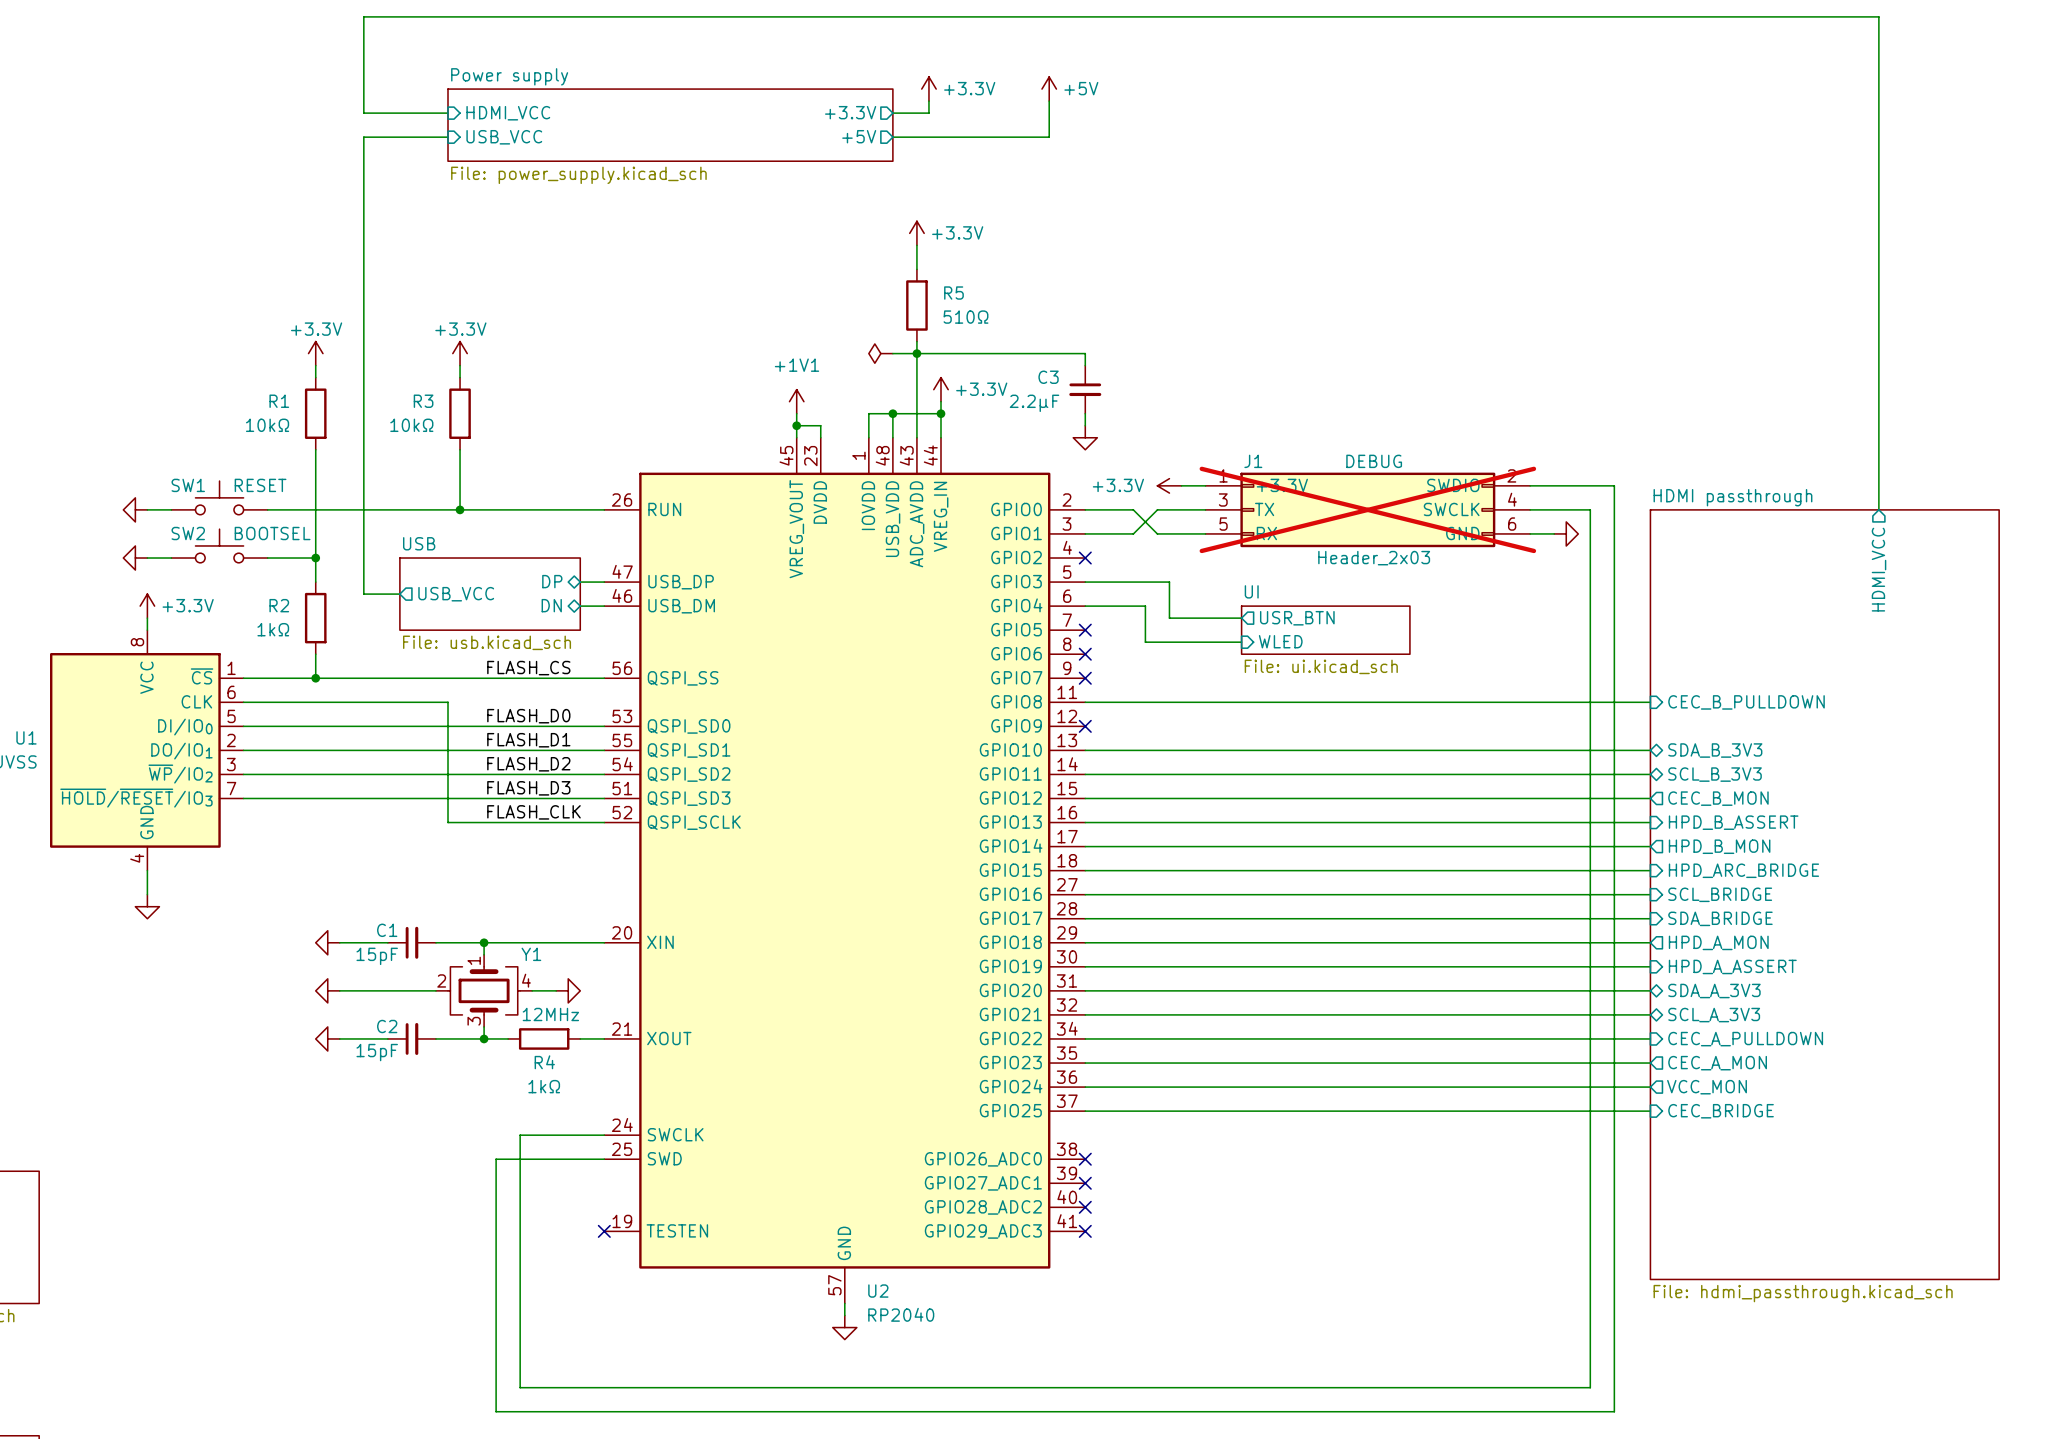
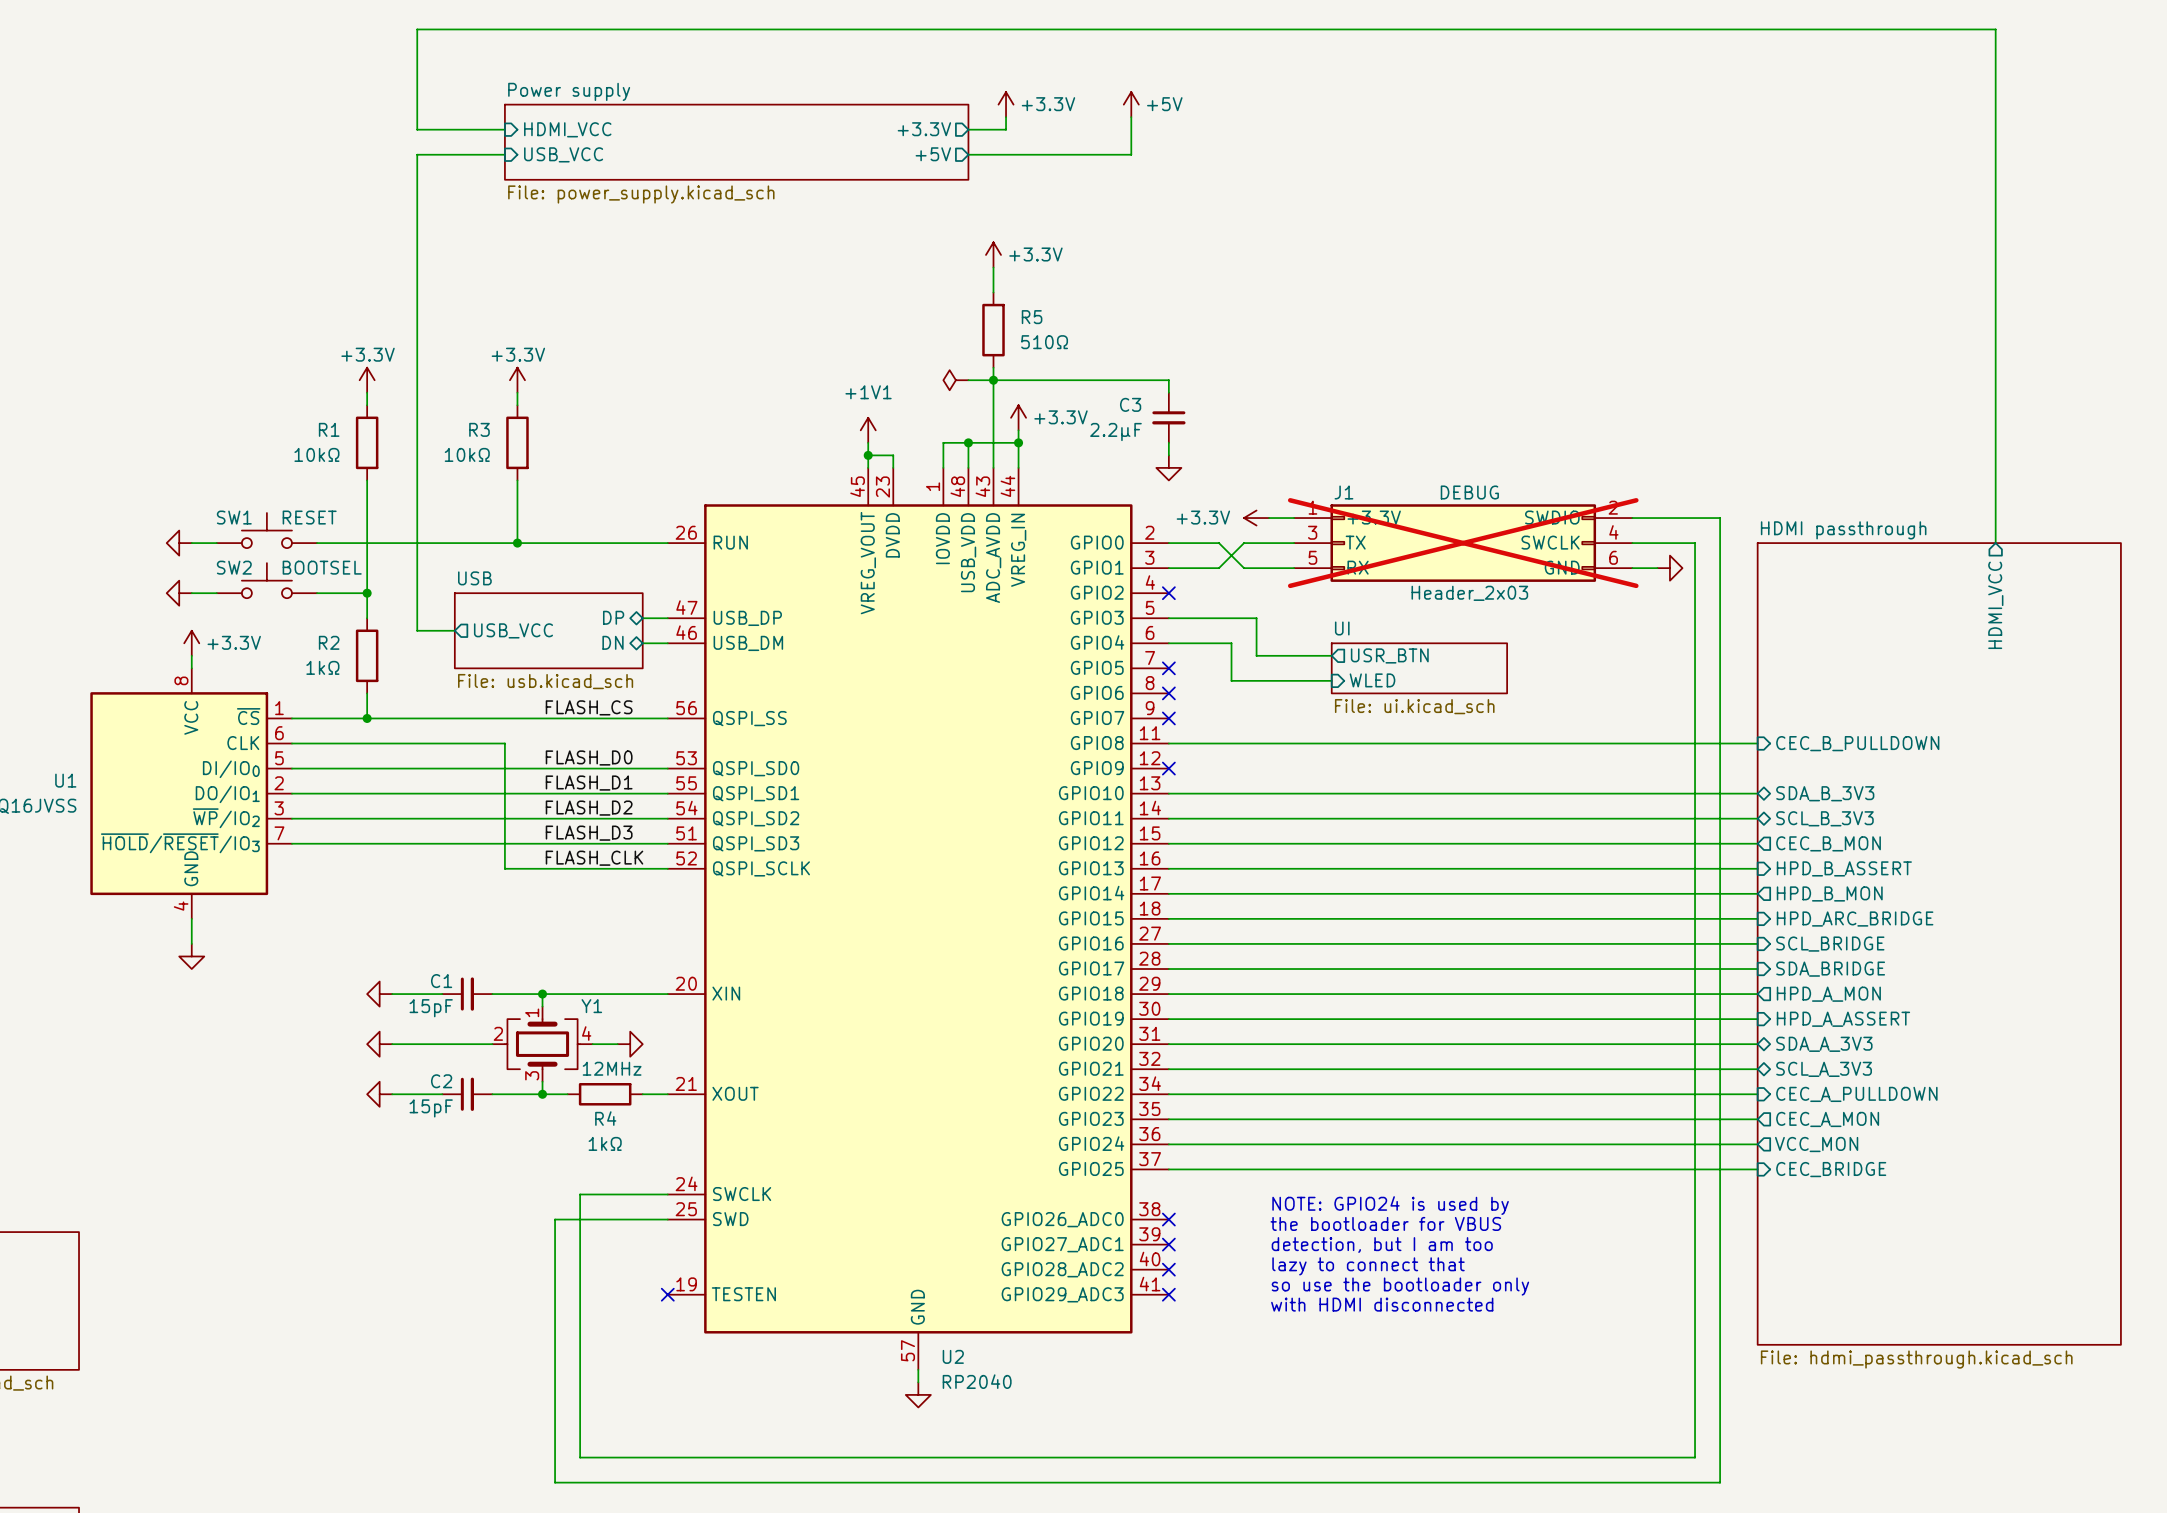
text: none -> NOTE: GPIO24 is used by (1390, 1205)
text: none -> the bootloader for VBUS (1385, 1223)
text: none -> detection, but I am too (1382, 1245)
text: none -> lazy to connect that (1368, 1266)
text: none -> so use the bootloader only (1400, 1286)
text: none -> with HDMI disconnected (1382, 1304)

